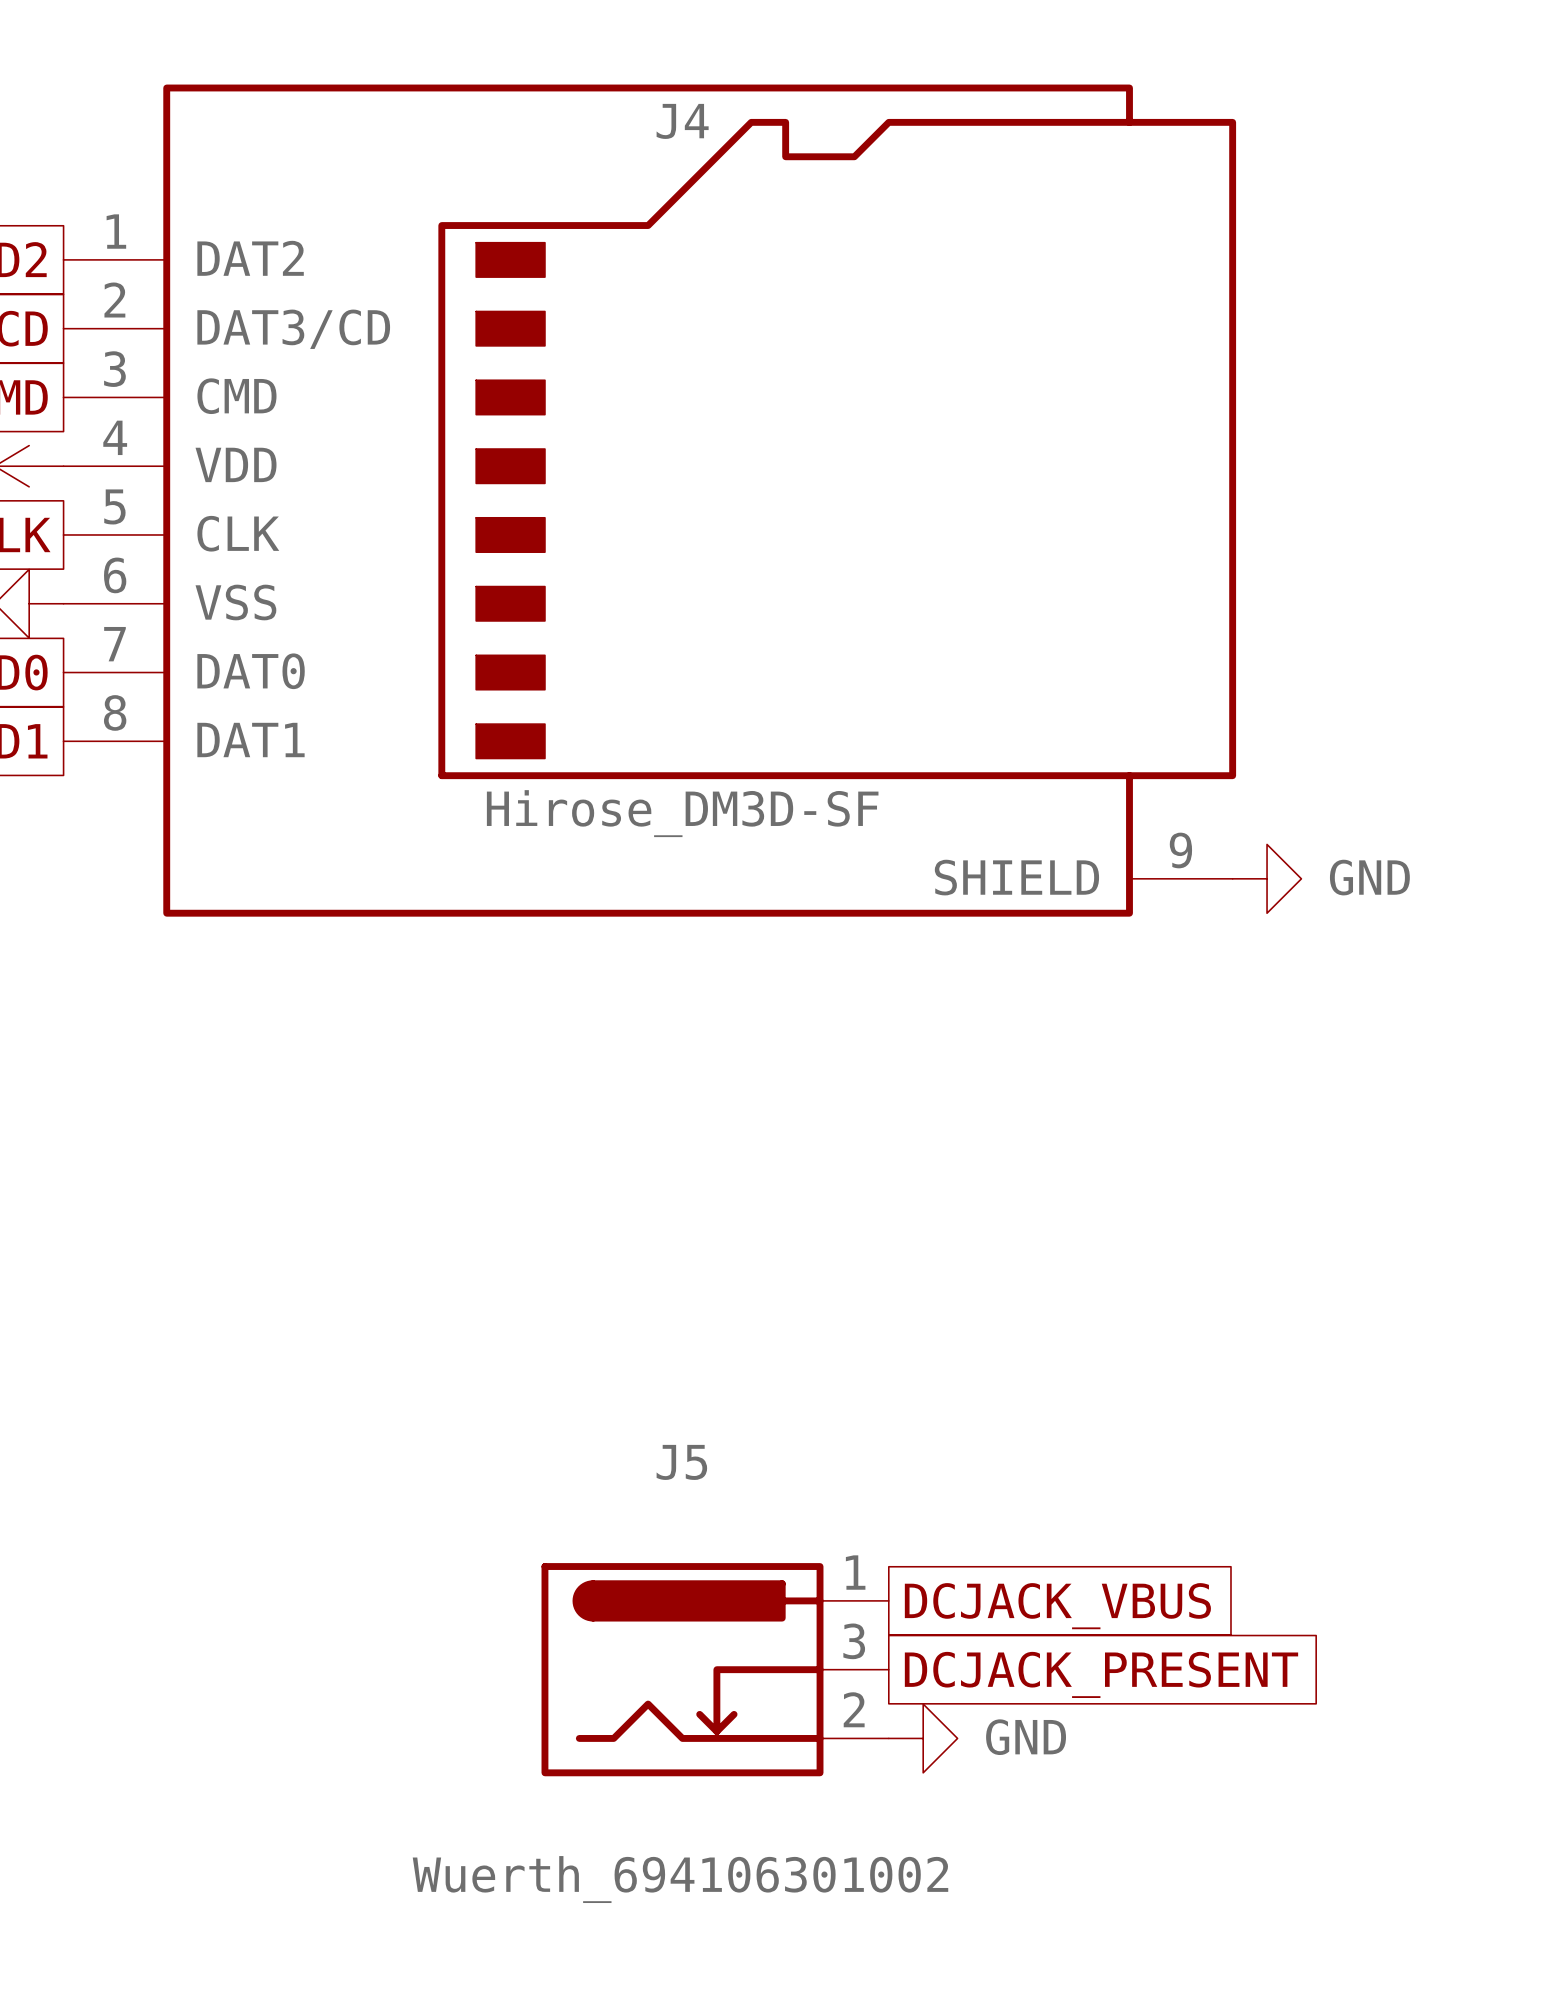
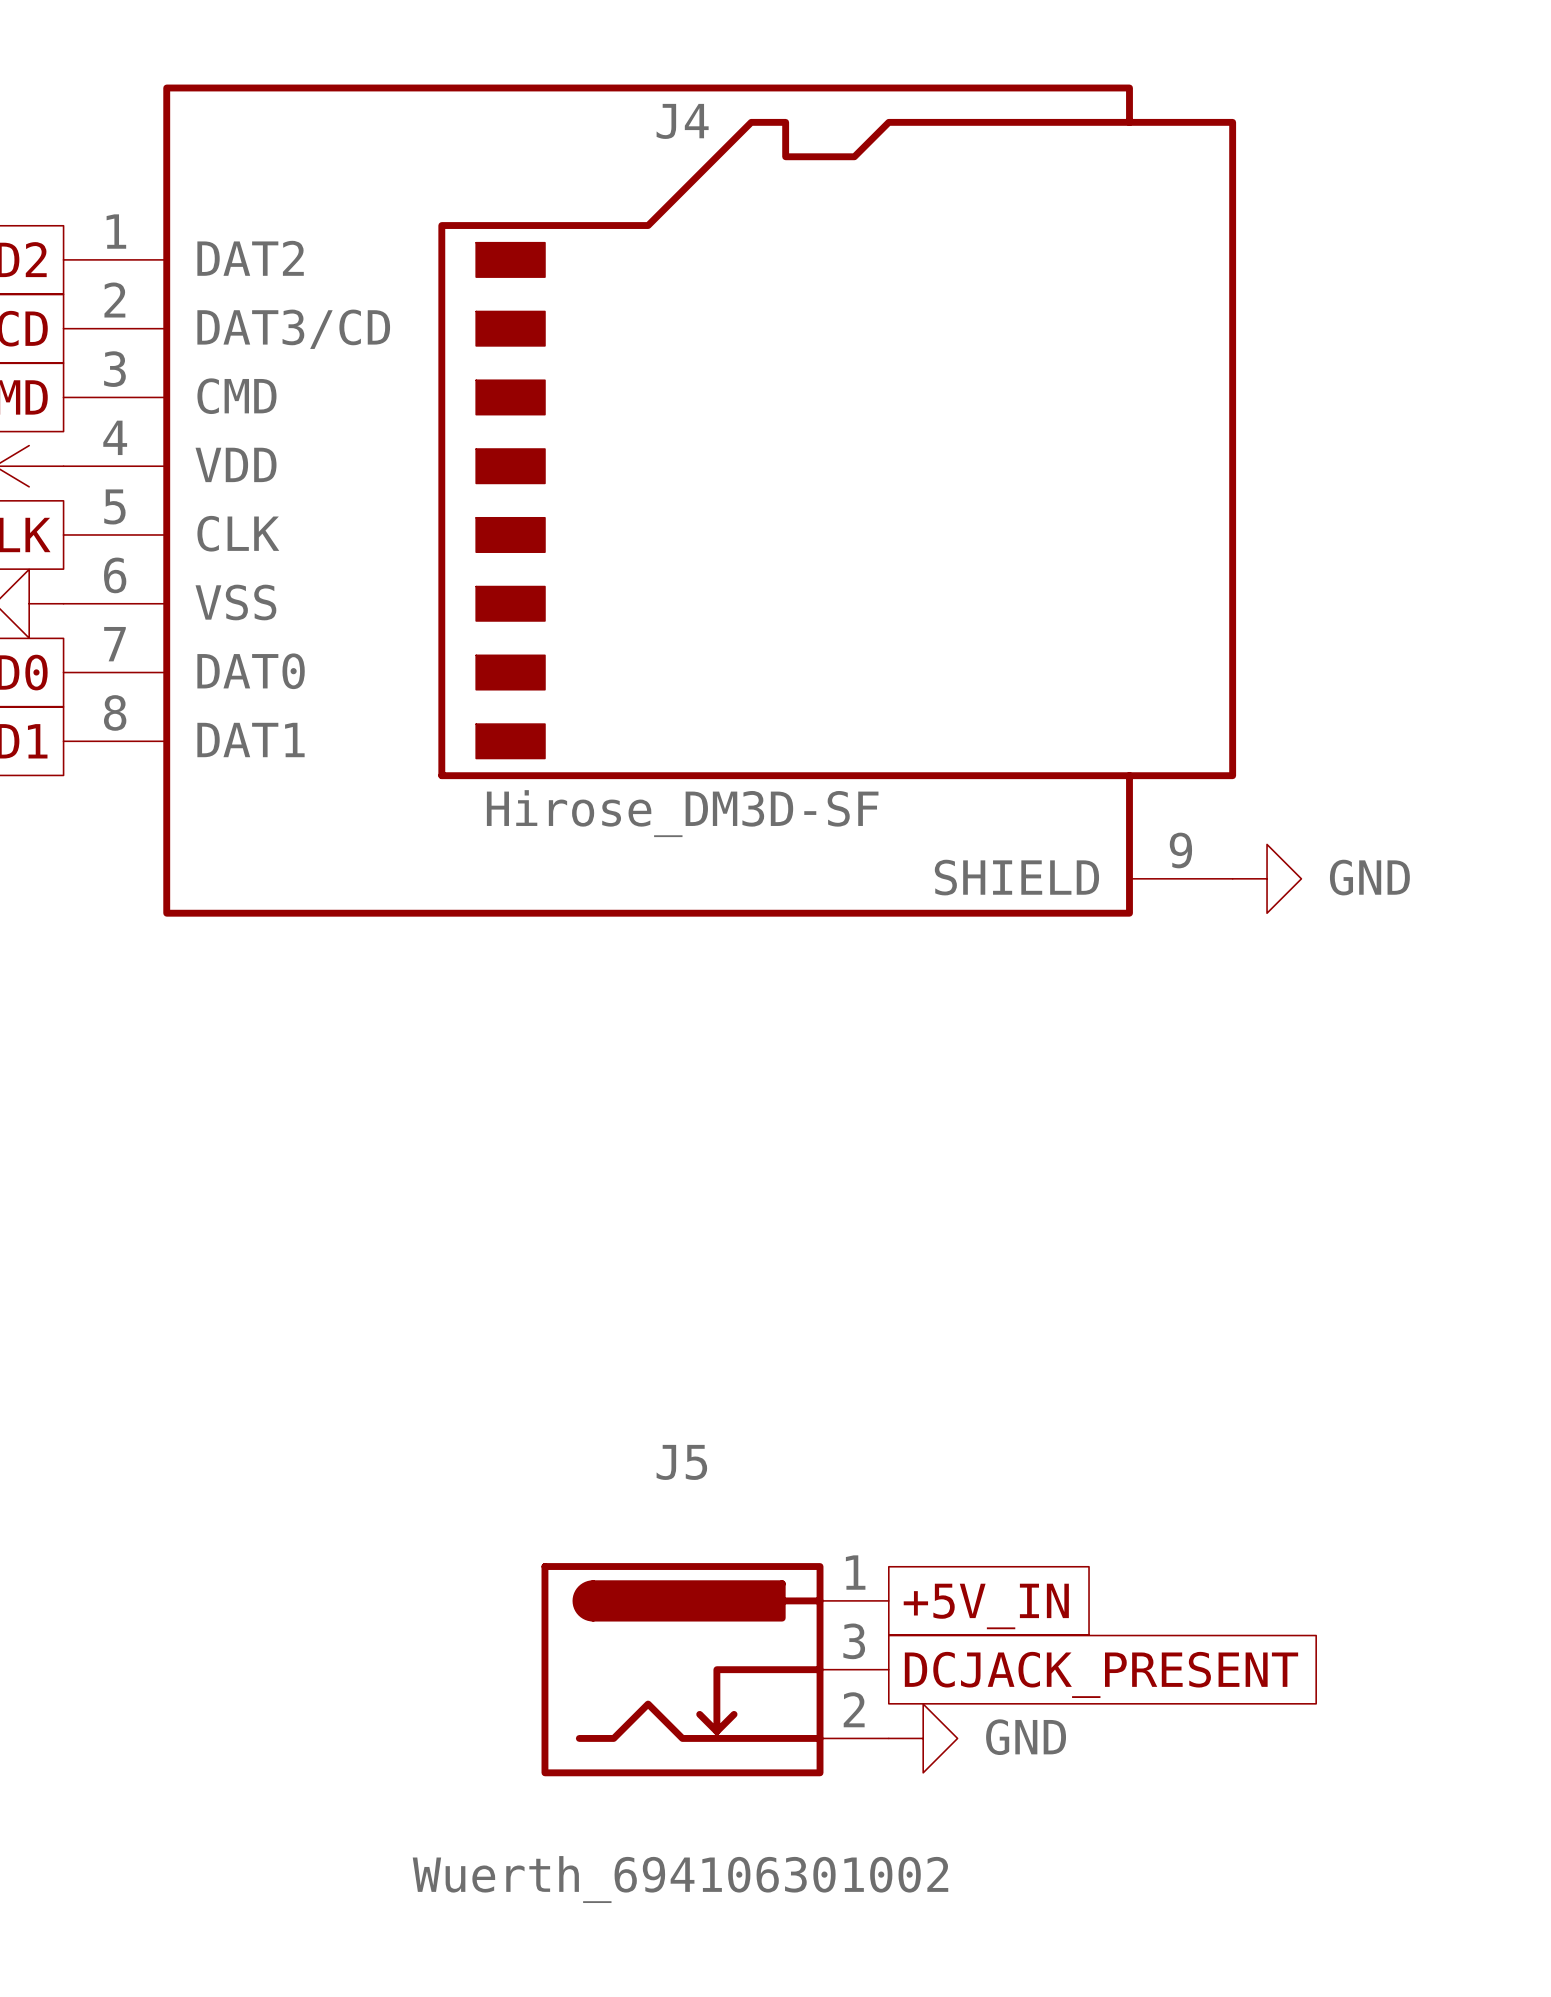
global label: DCJACK_VBUS (1057, 1606) -> +5V_IN (986, 1606)

